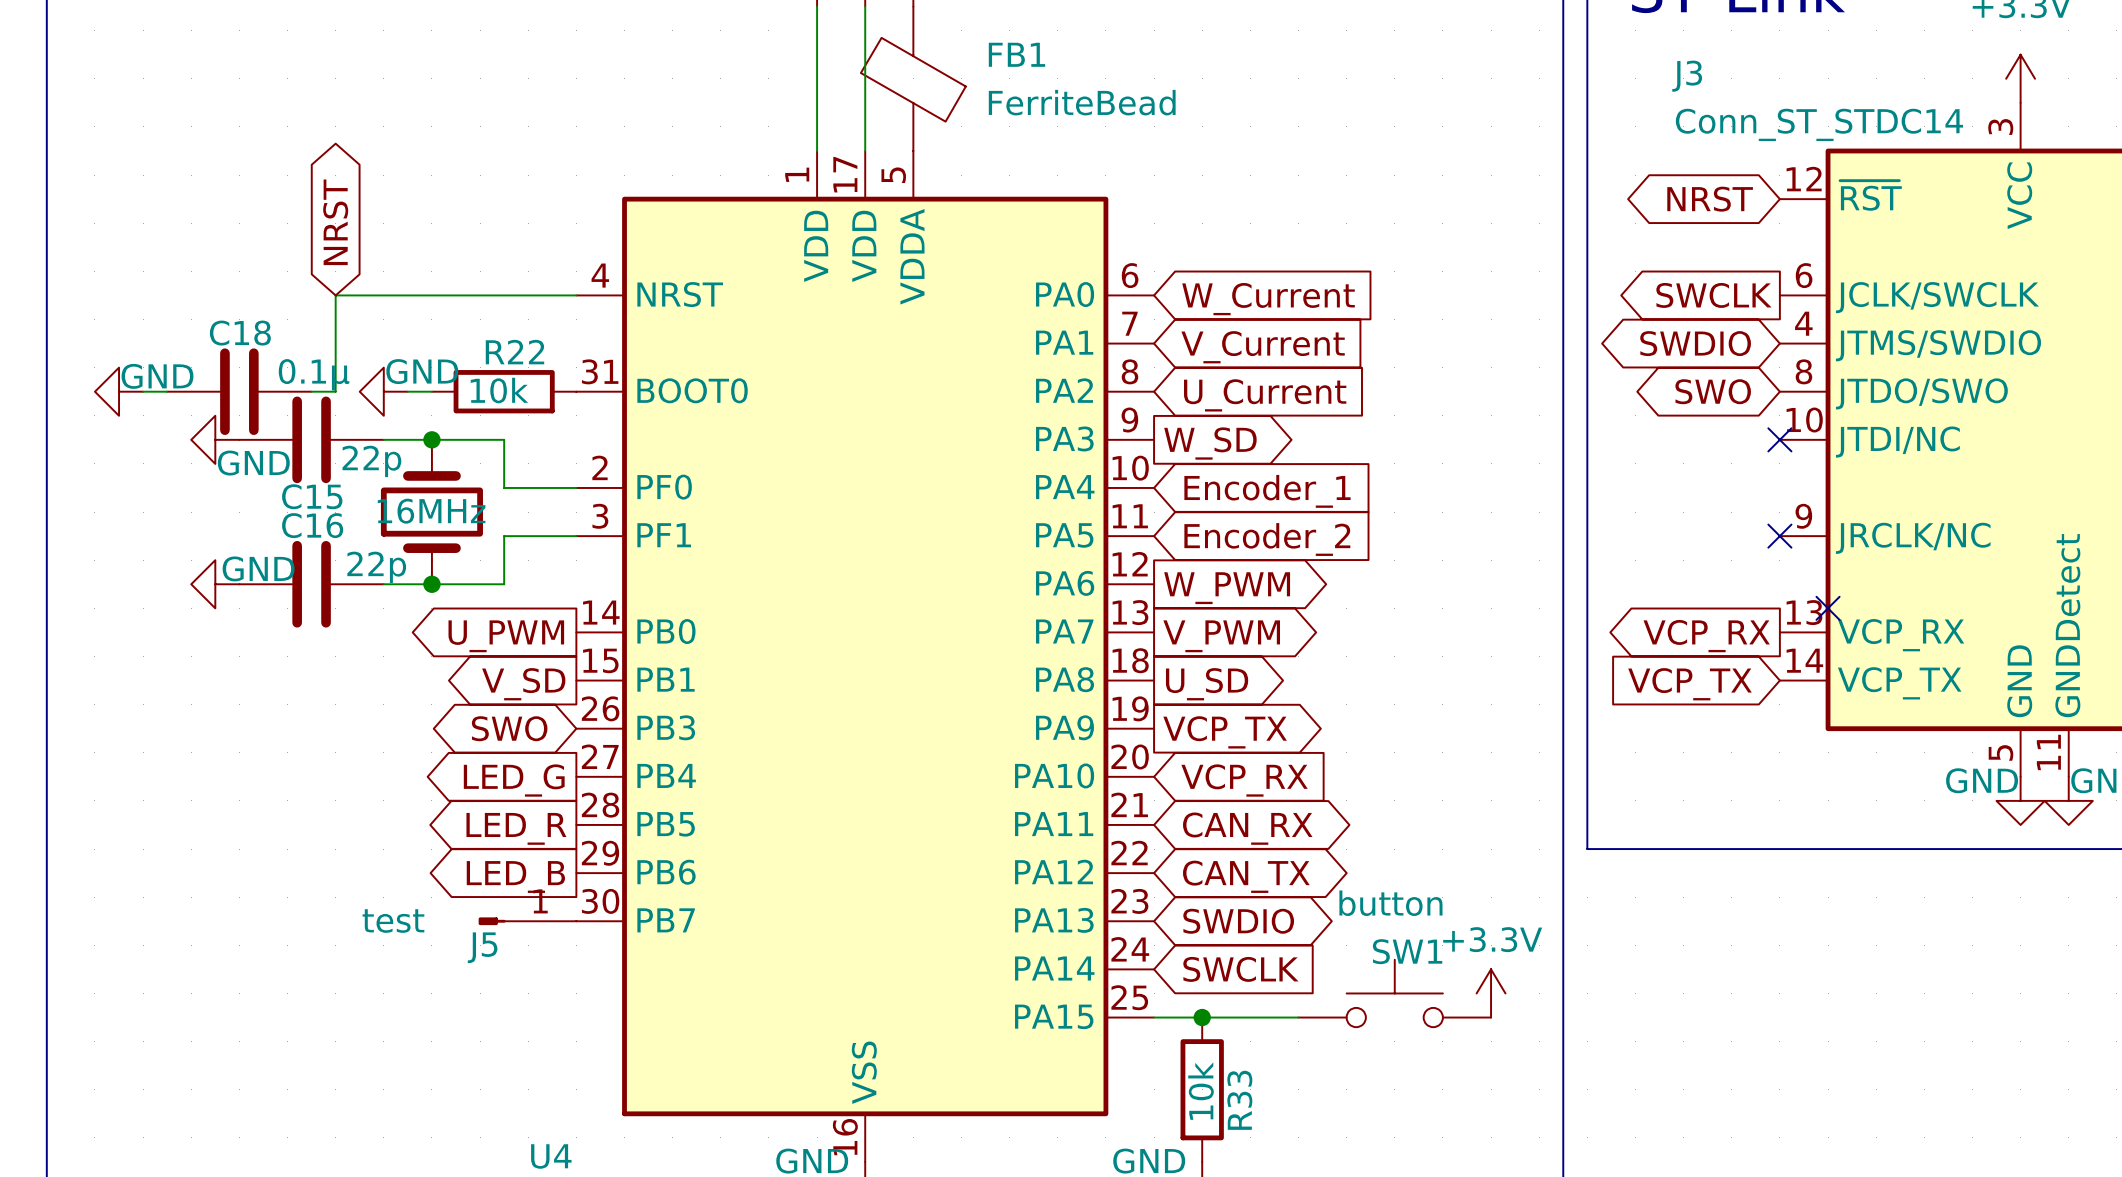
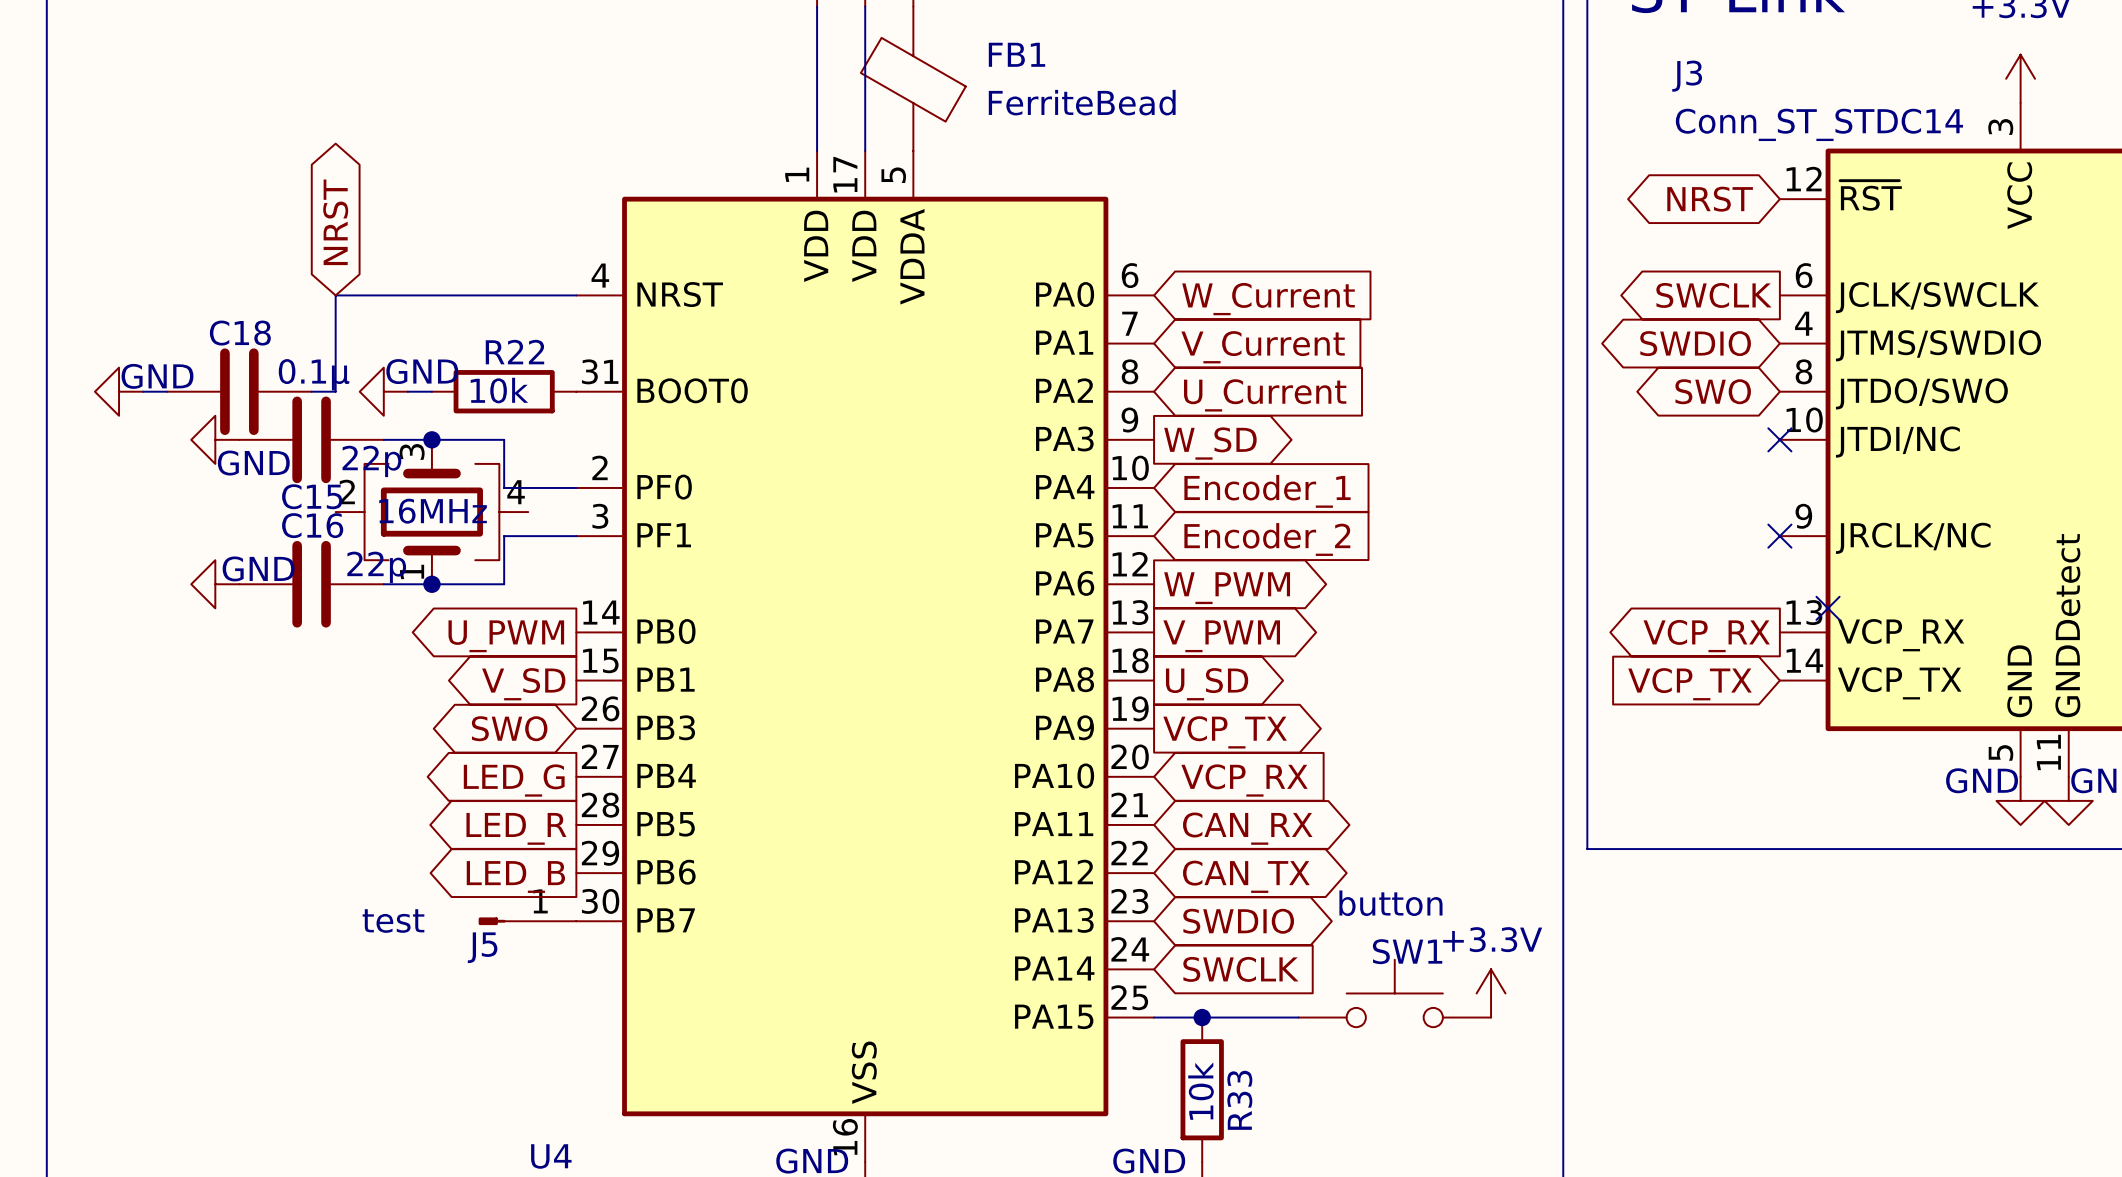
part symbol: [380, 439, 483, 585] -> [335, 439, 529, 585]

